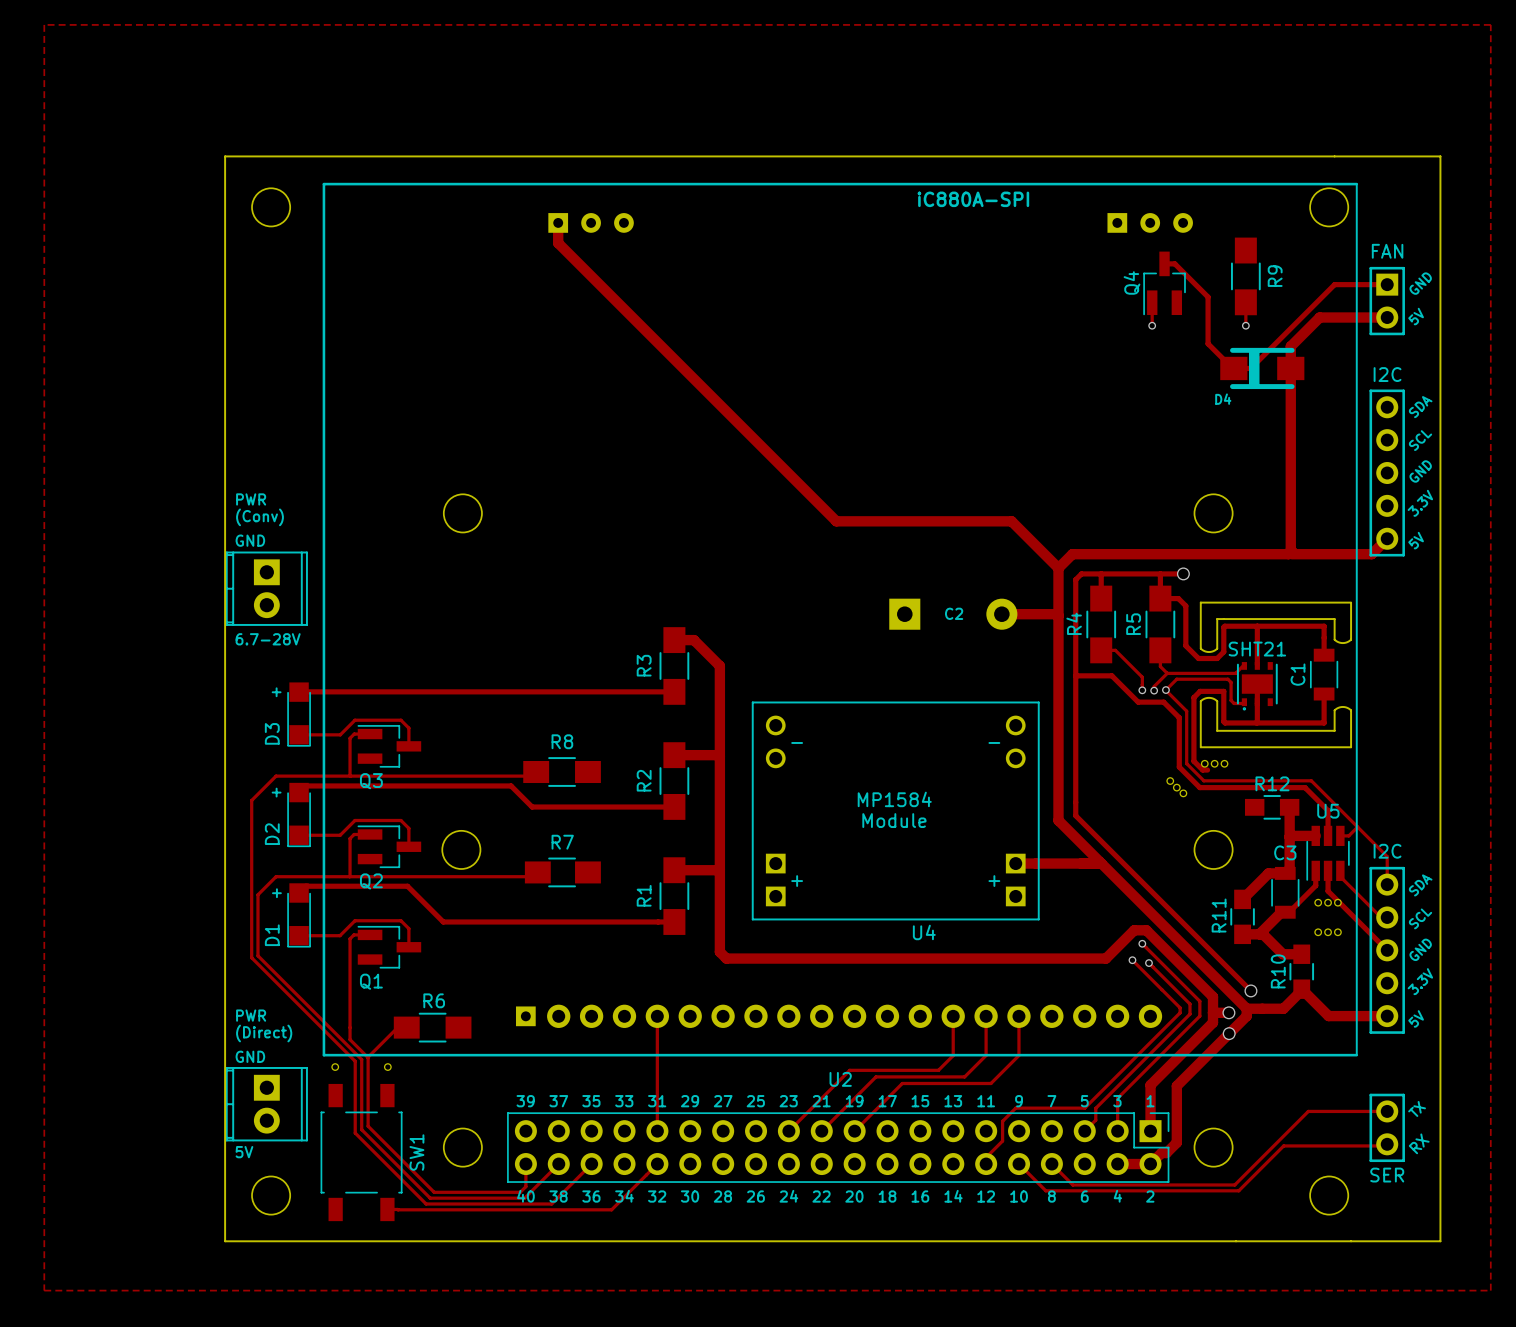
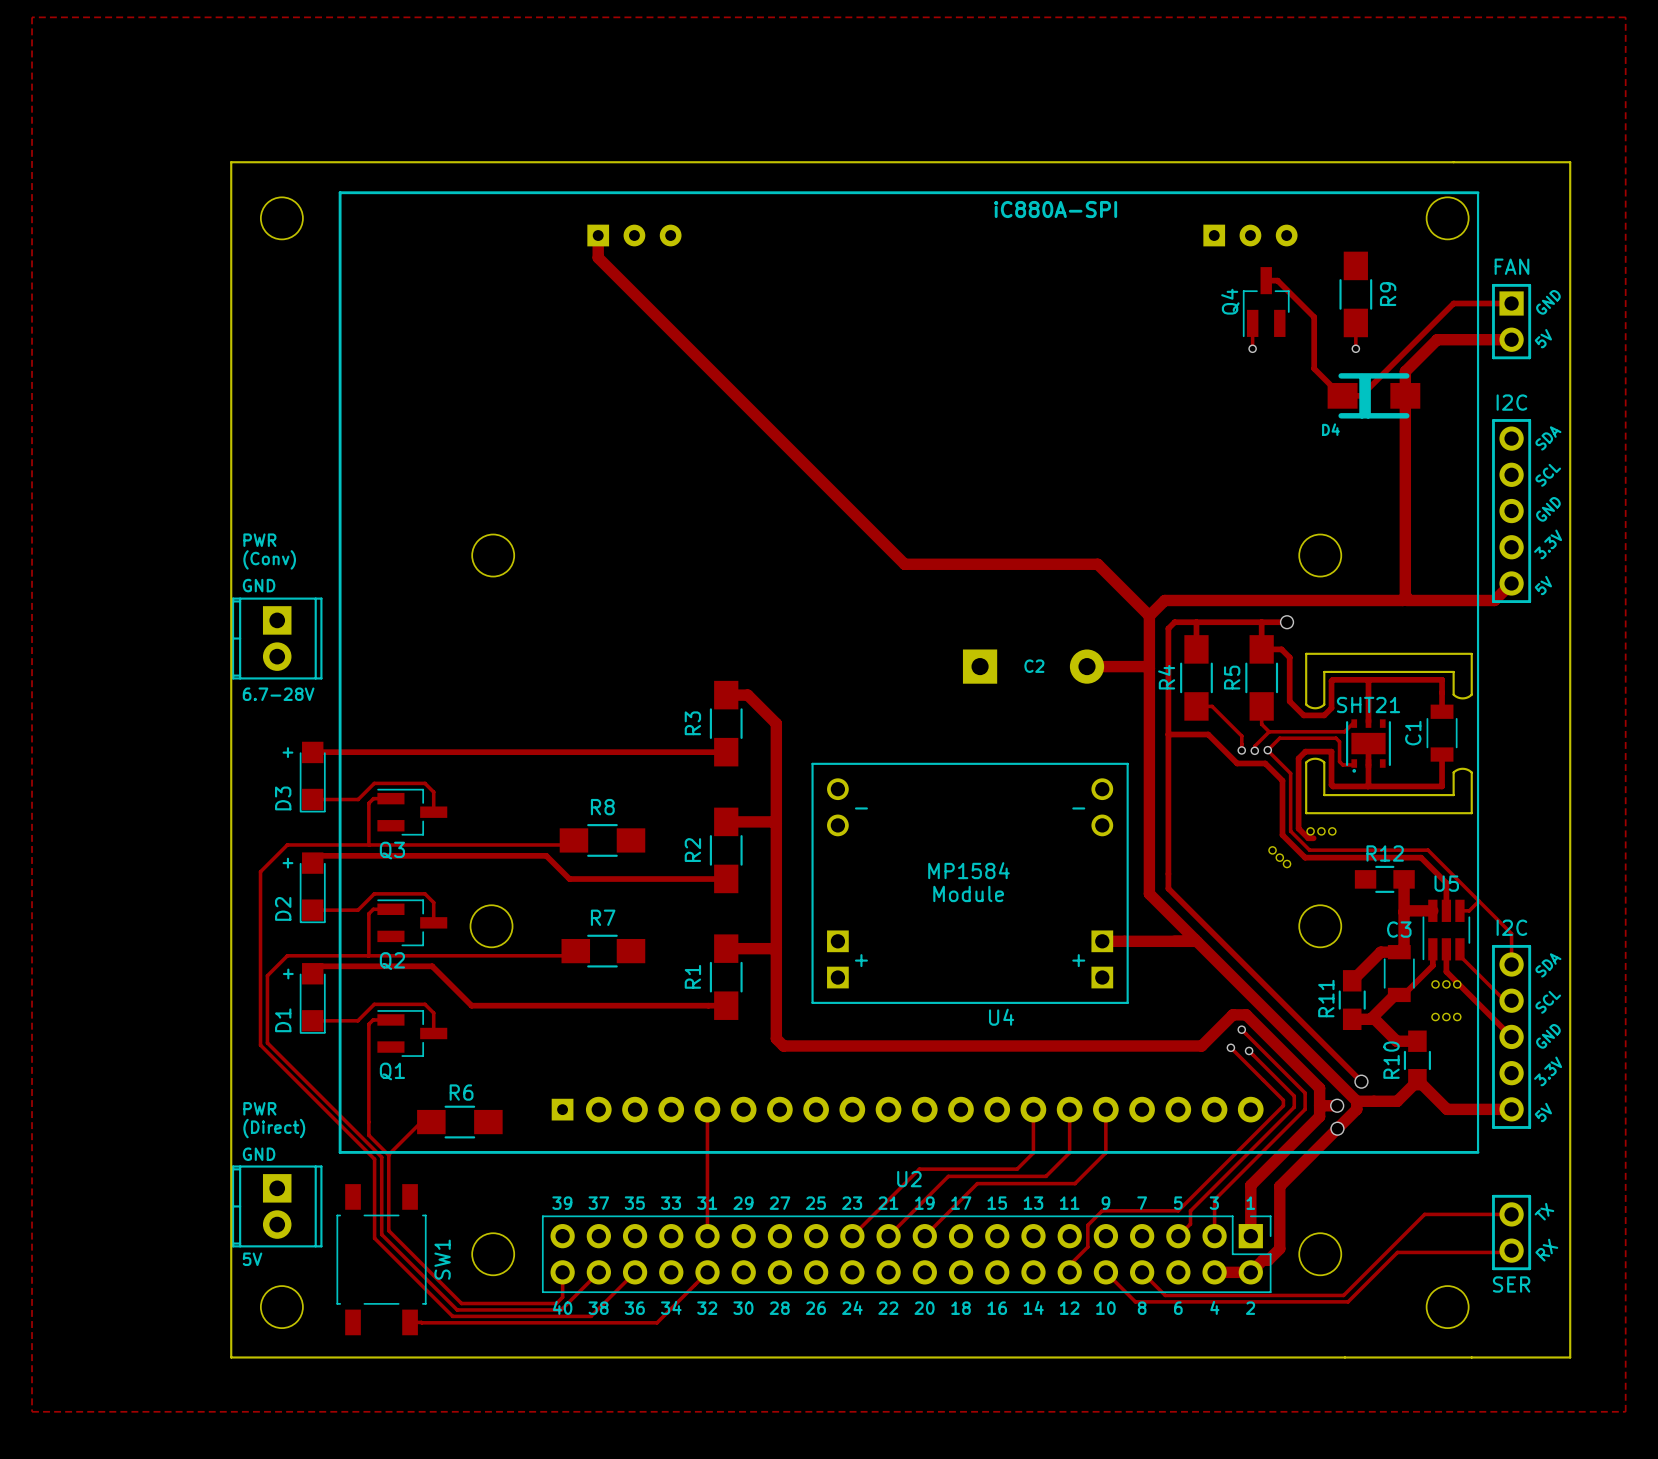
part: (335, 1067) -> none
part: (387, 1067) -> none

